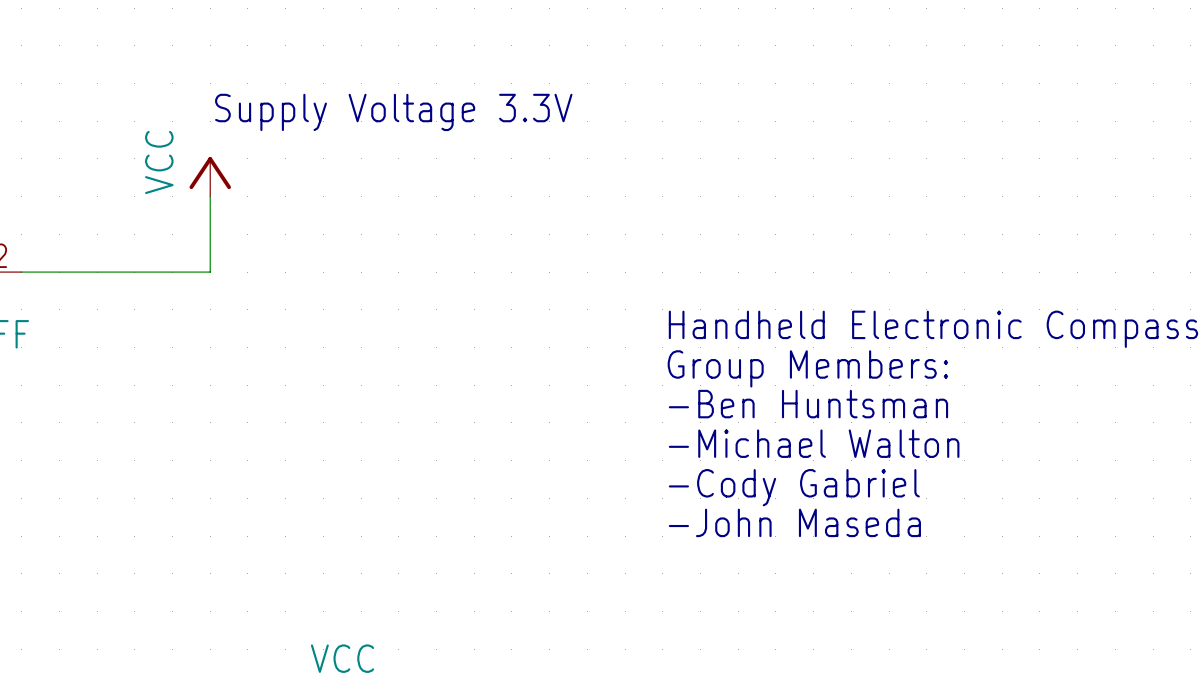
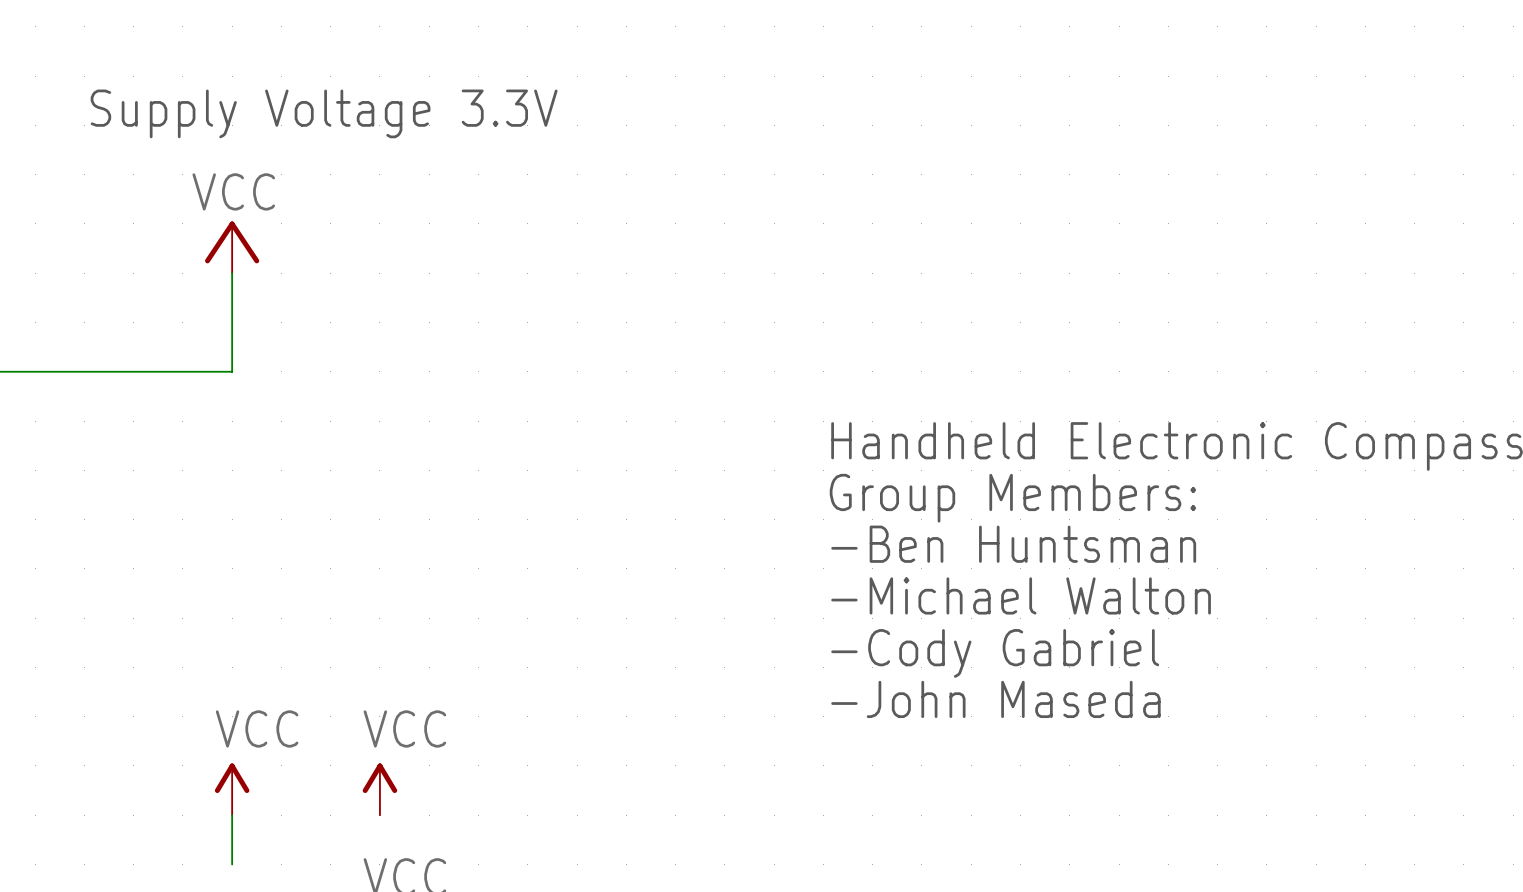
text position: Supply Voltage 3.3V (393, 112) -> Supply Voltage 3.3V (324, 113)
power symbol text rotation: 0° (159, 162) -> 90° clockwise (233, 191)
power symbol: none -> VCC (232, 789)
power symbol: none -> VCC (379, 789)
wire: none -> (232, 815) (232, 864)

